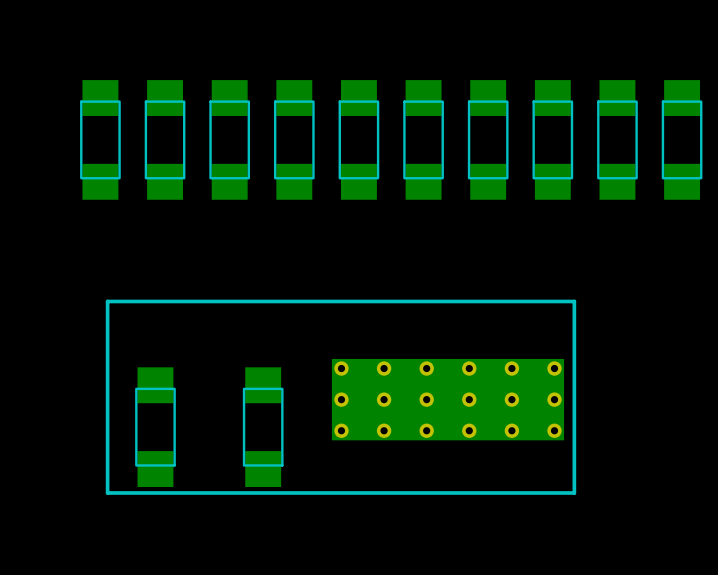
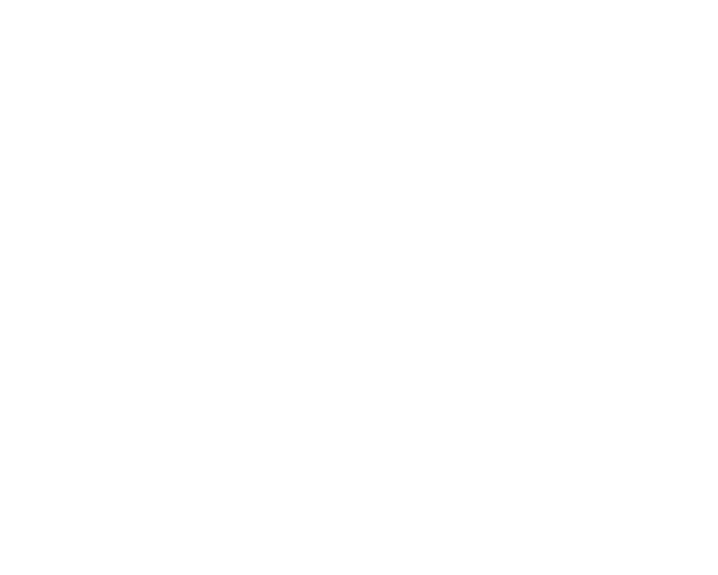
part: (100, 139) -> none
part: (165, 139) -> none
part: (229, 139) -> none
part: (294, 139) -> none
part: (358, 139) -> none
part: (423, 139) -> none
part: (488, 139) -> none
part: (552, 139) -> none
part: (617, 139) -> none
part: (682, 139) -> none
line: (574, 301) (107, 301) (107, 492) (574, 492) (574, 301) -> none
part: (447, 399) -> none
part: (155, 427) -> none
part: (263, 427) -> none

